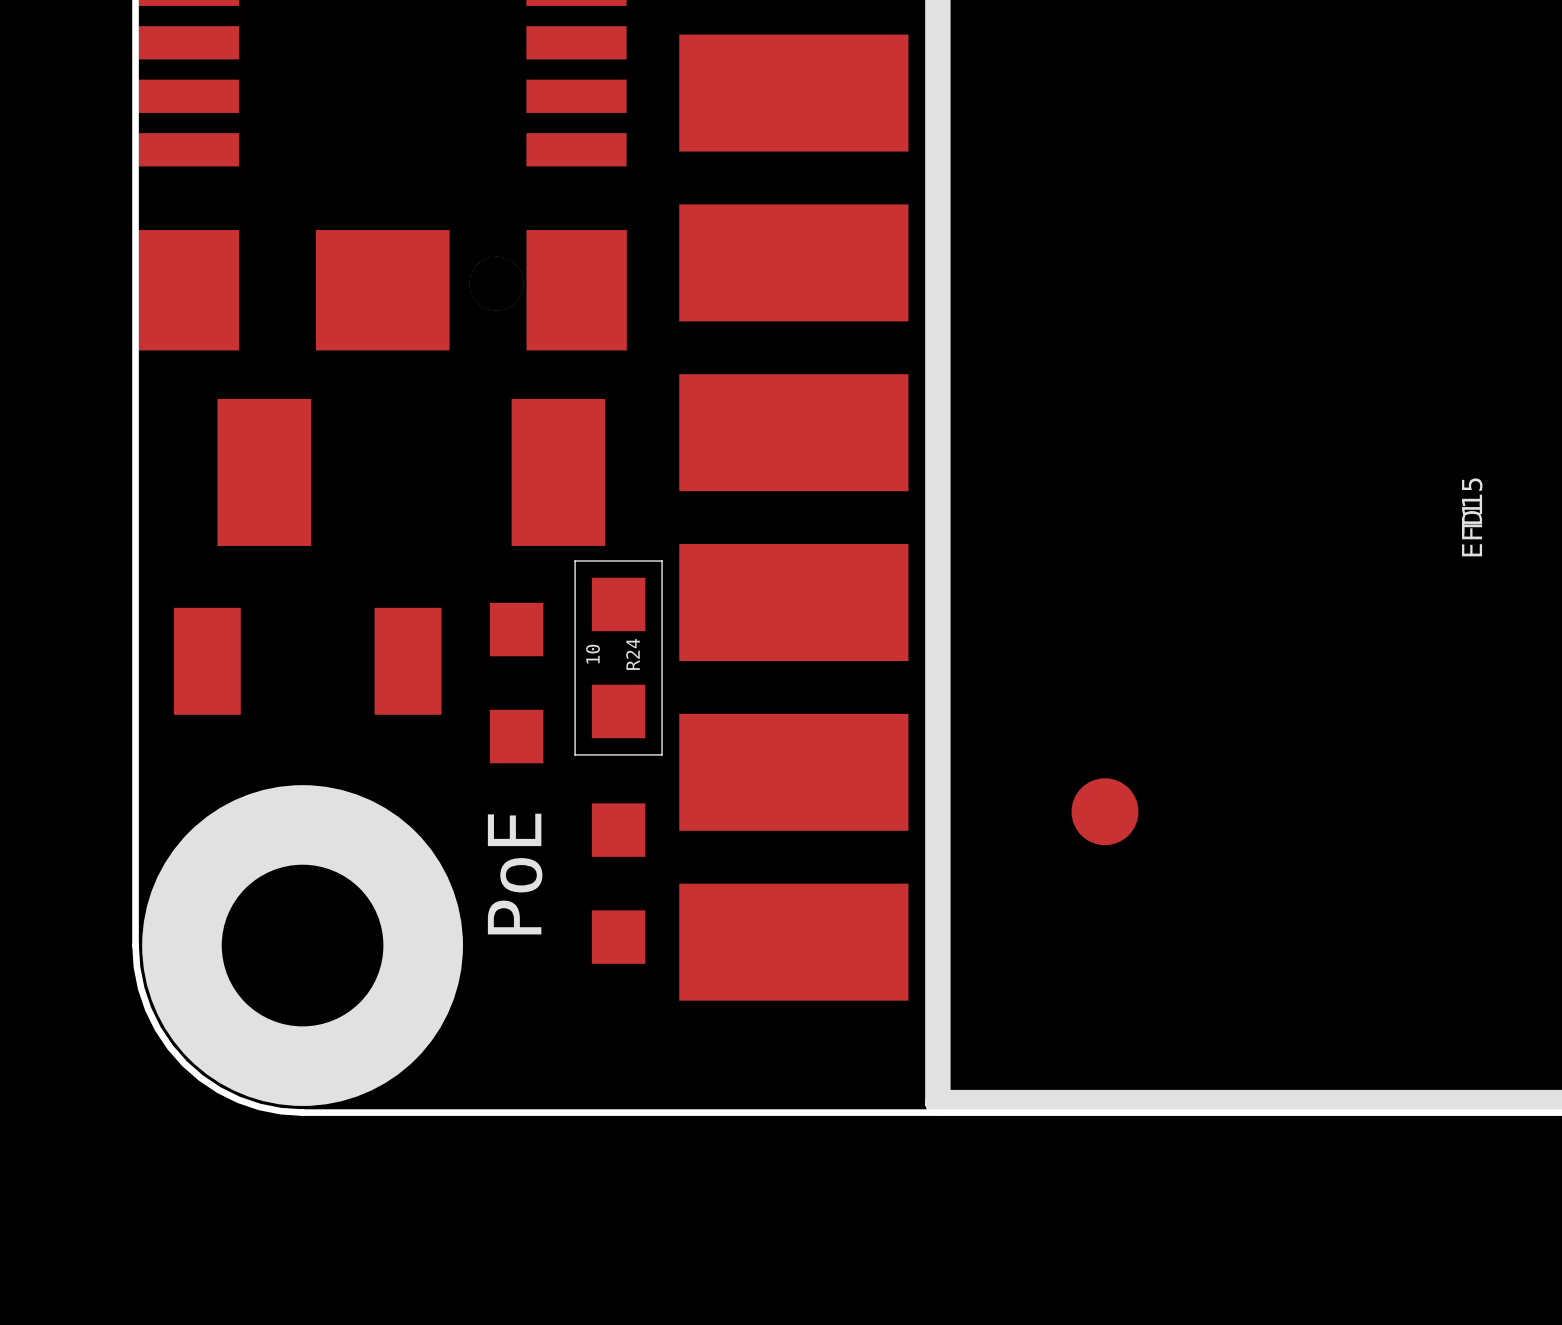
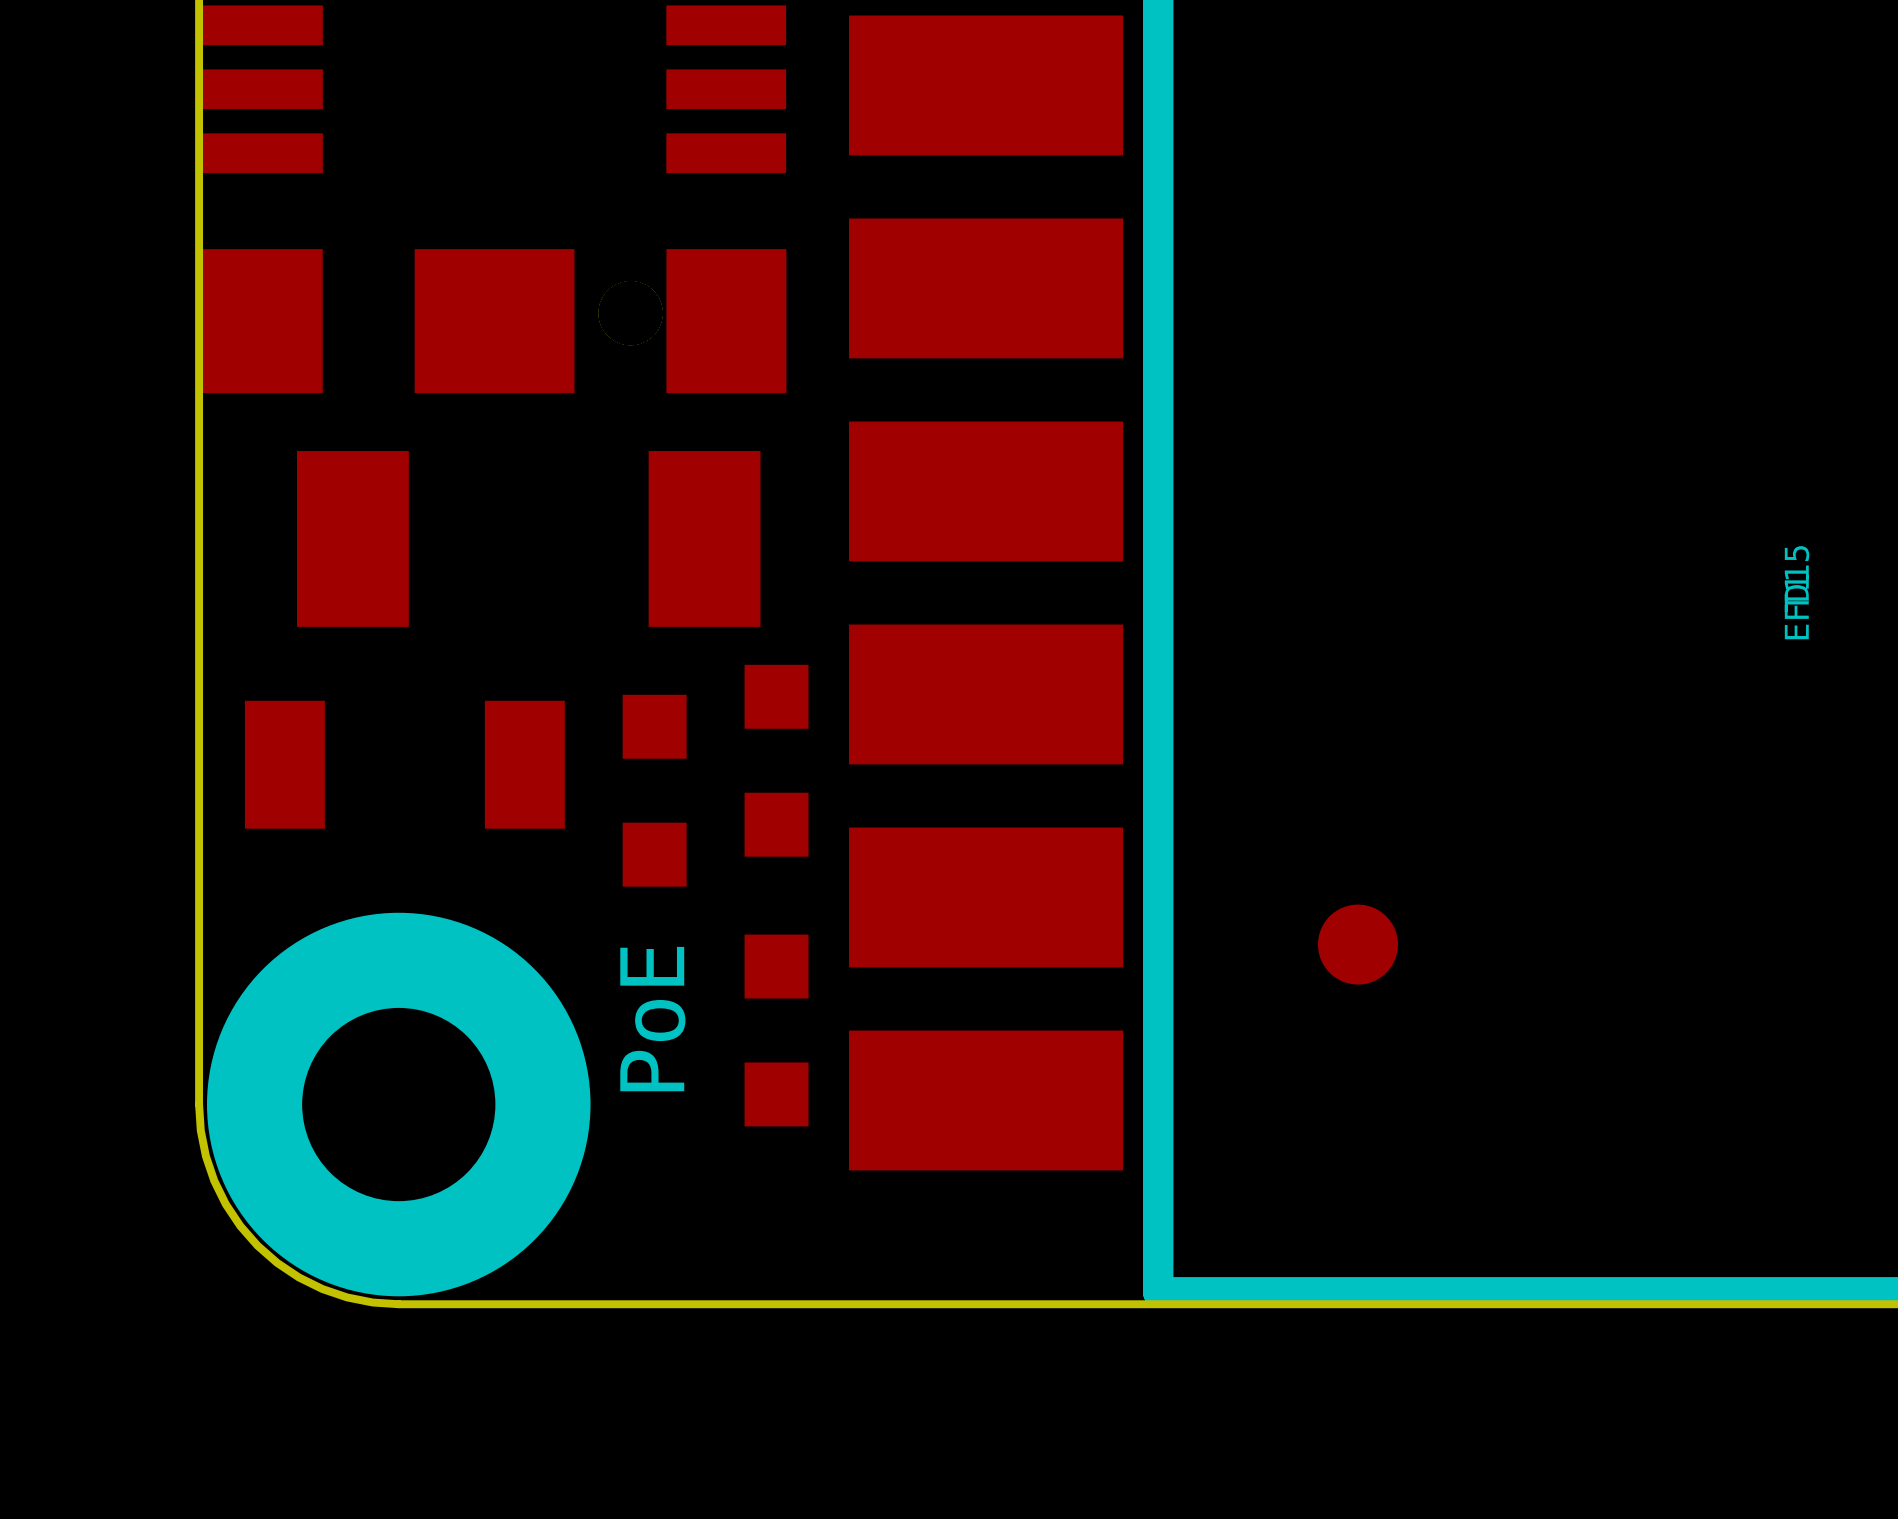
R24: 10 (618, 657) -> none

